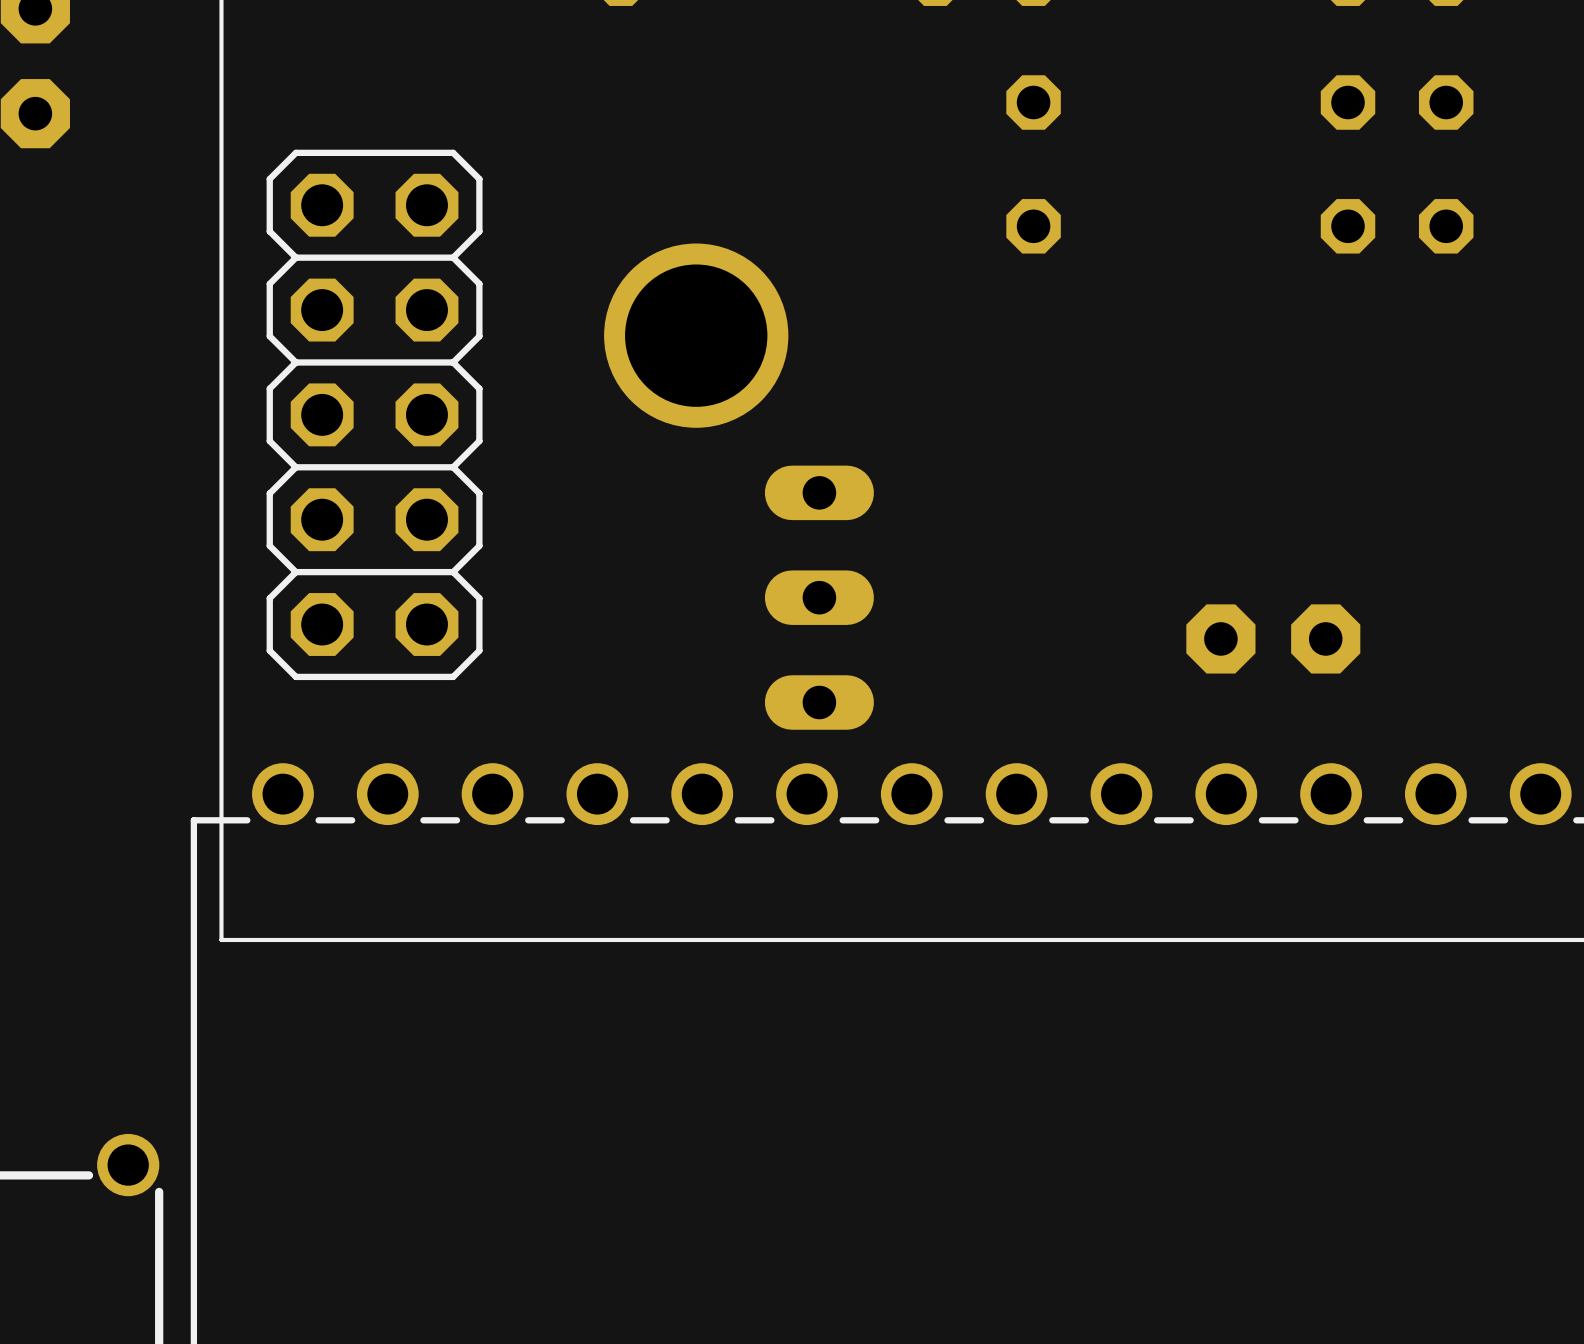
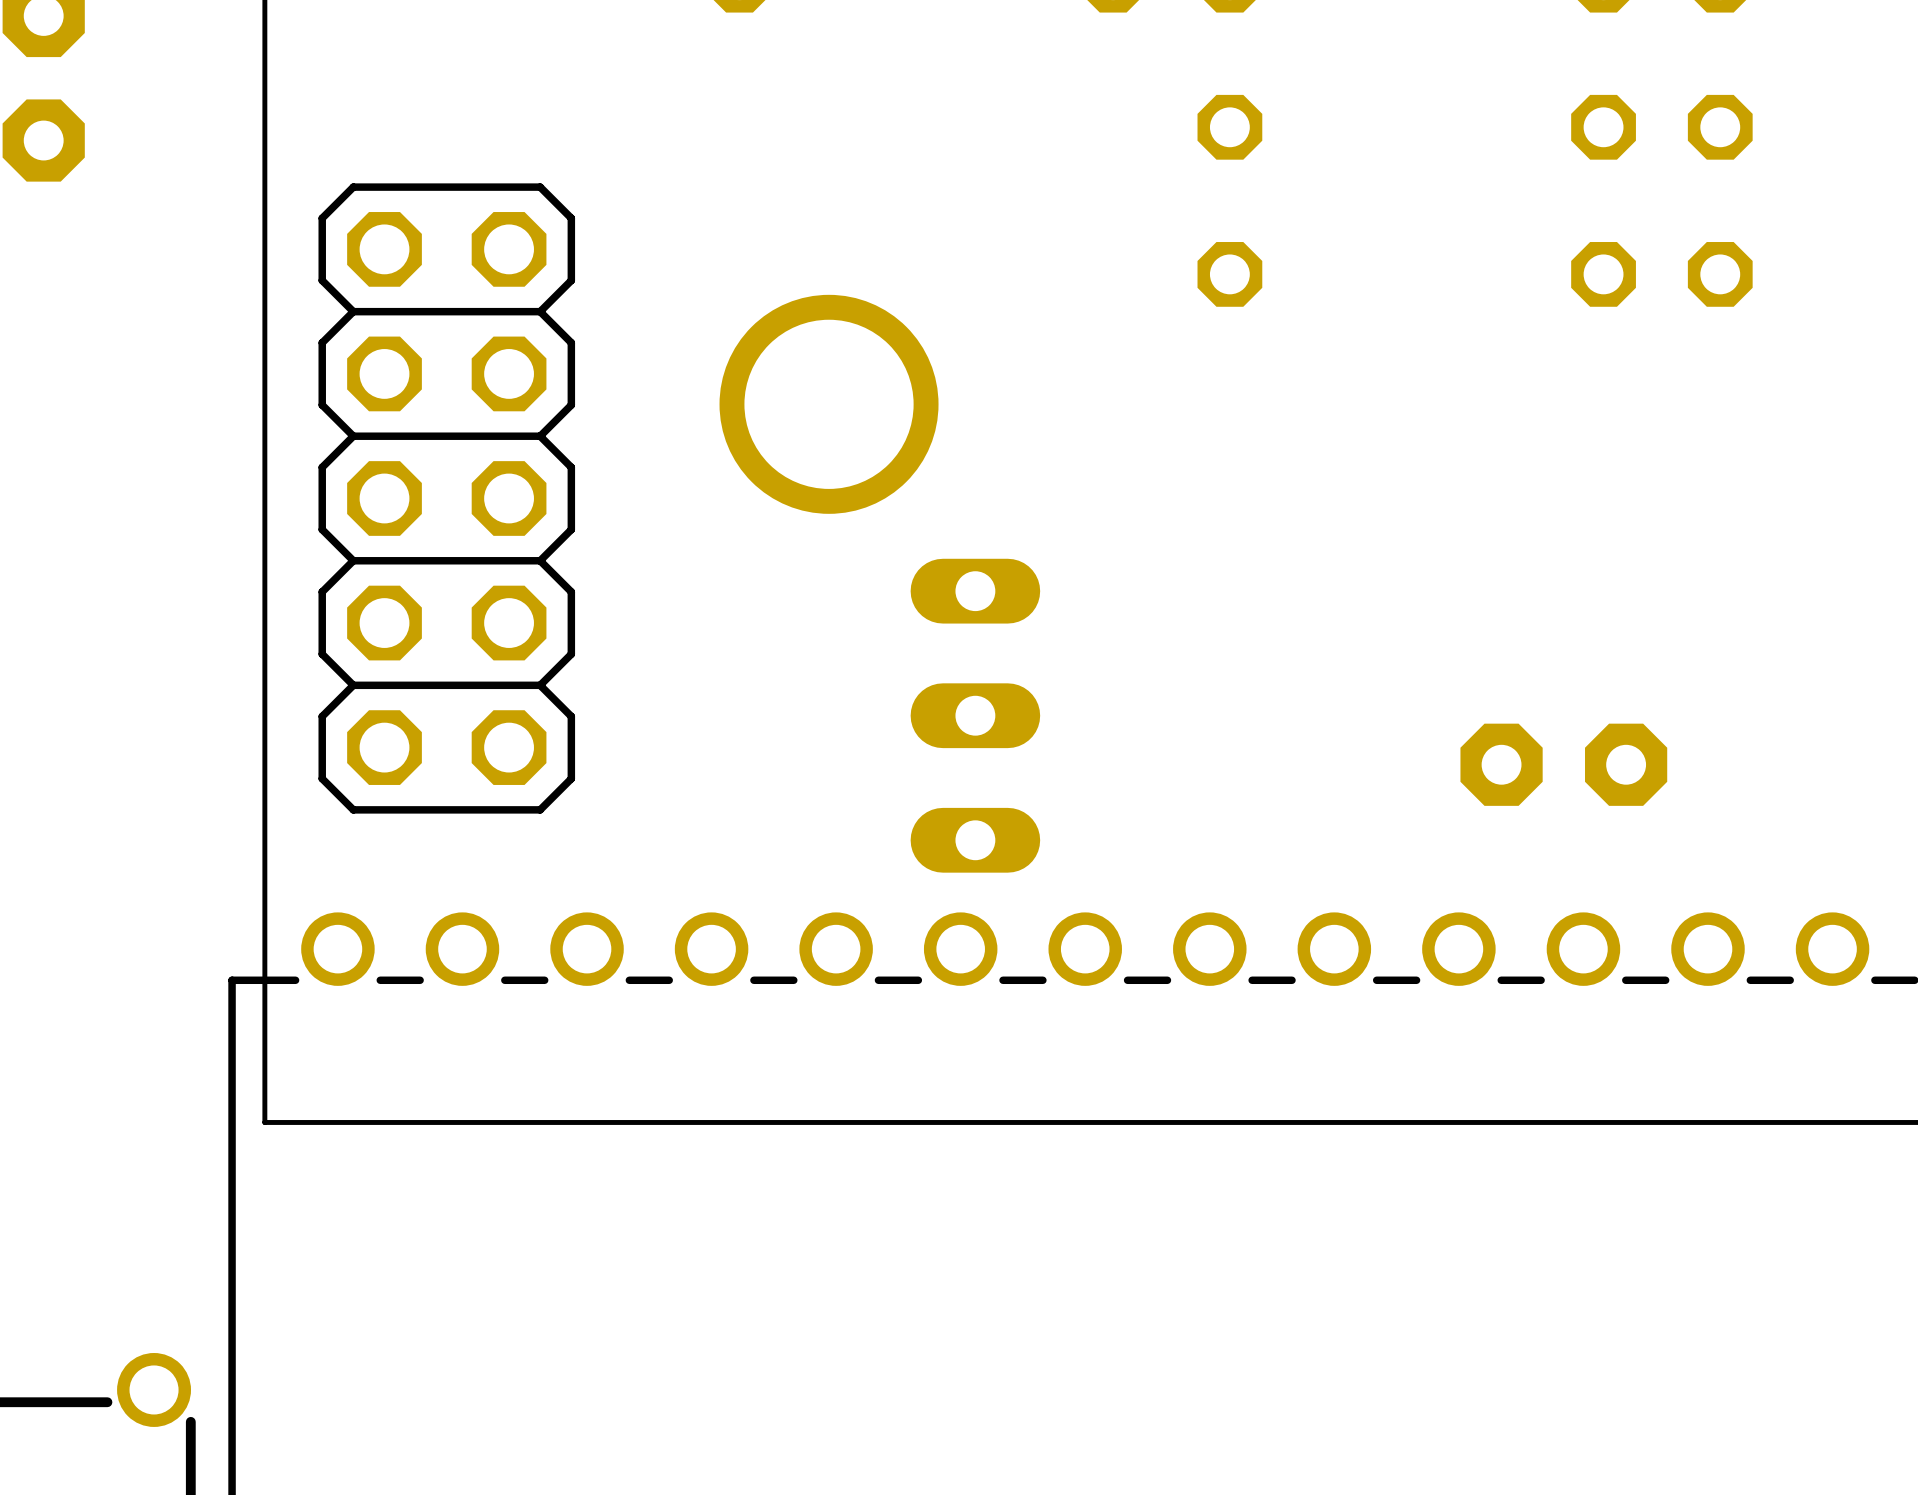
part position: (1273, 638) -> (1563, 764)

